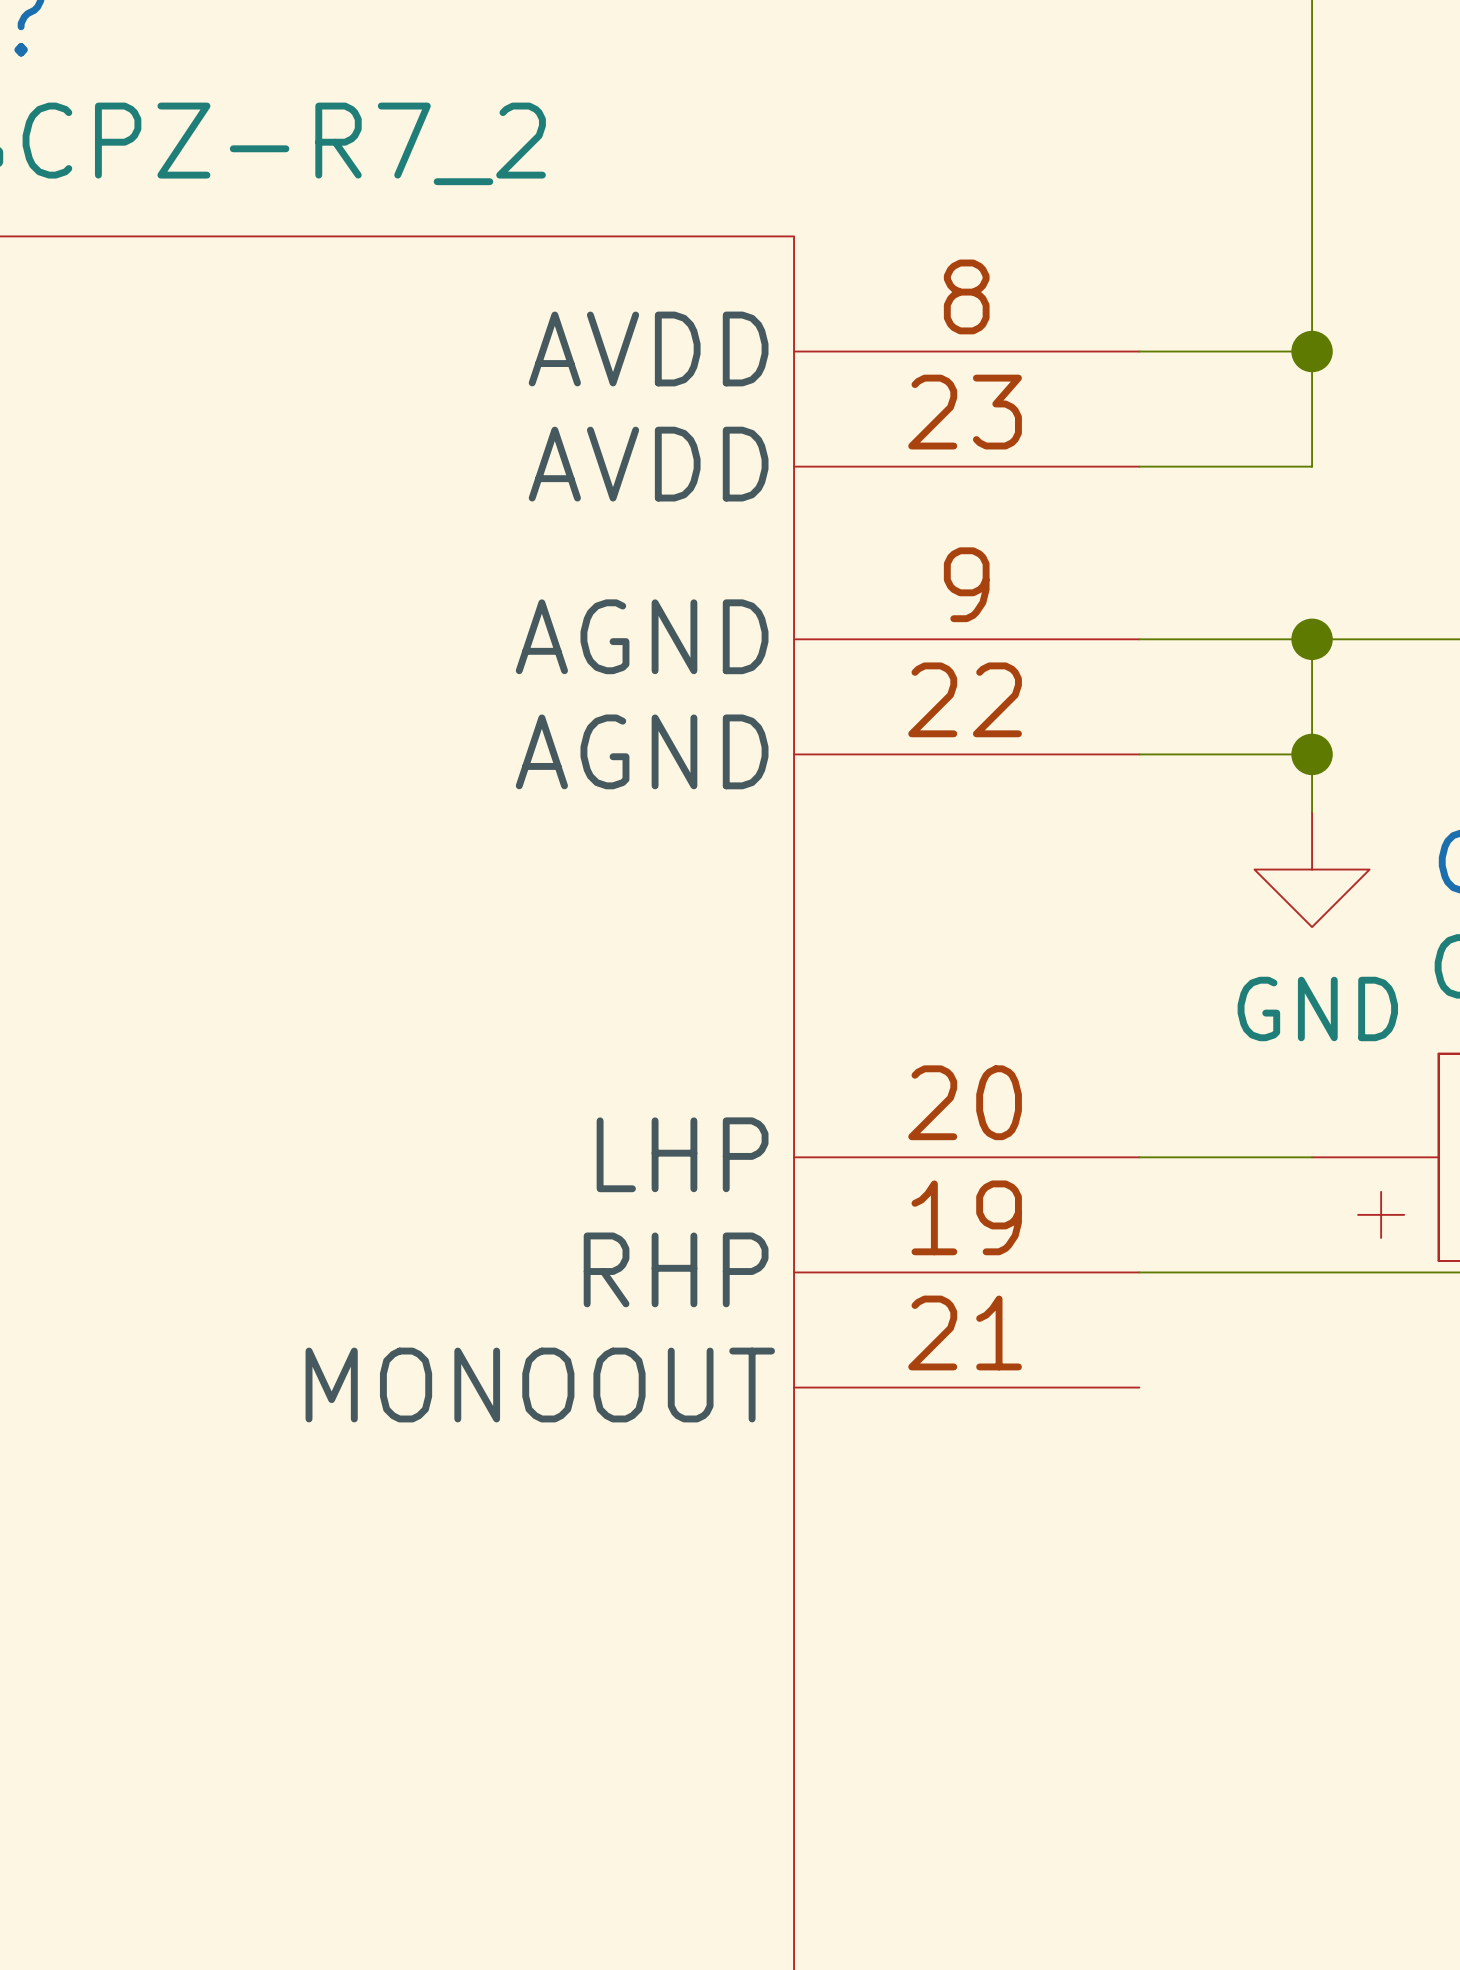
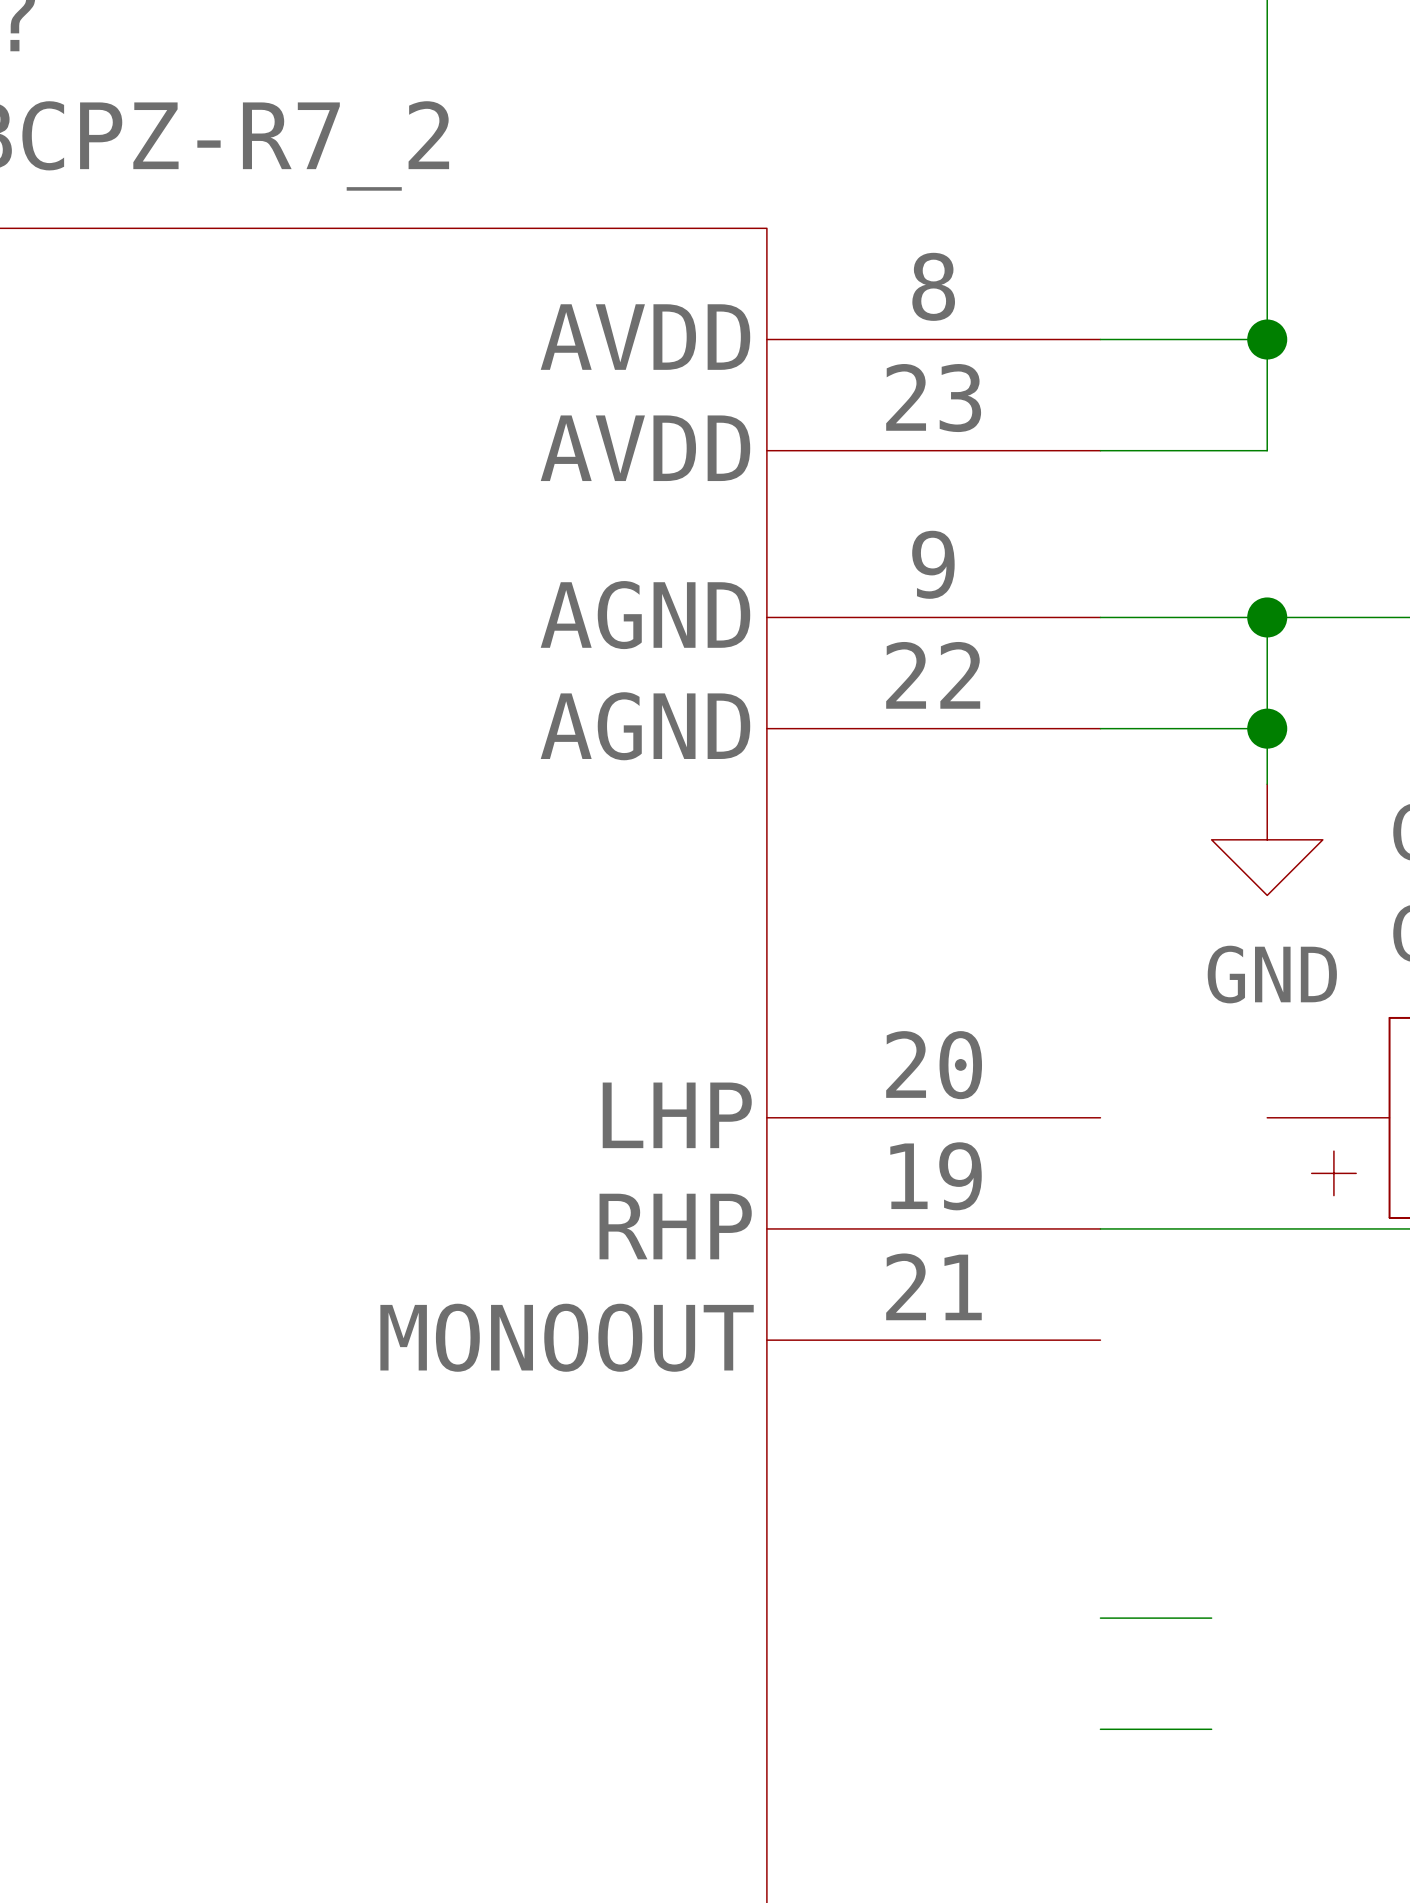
wire: (1139, 1157) (1312, 1157) -> none
wire: none -> (1100, 1618) (1211, 1618)
wire: none -> (1100, 1729) (1211, 1729)

